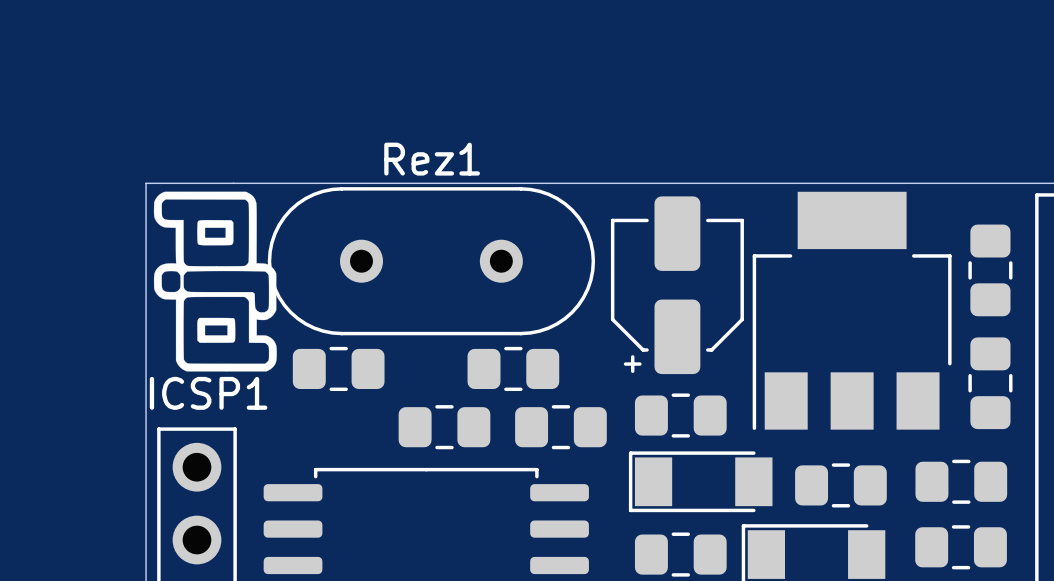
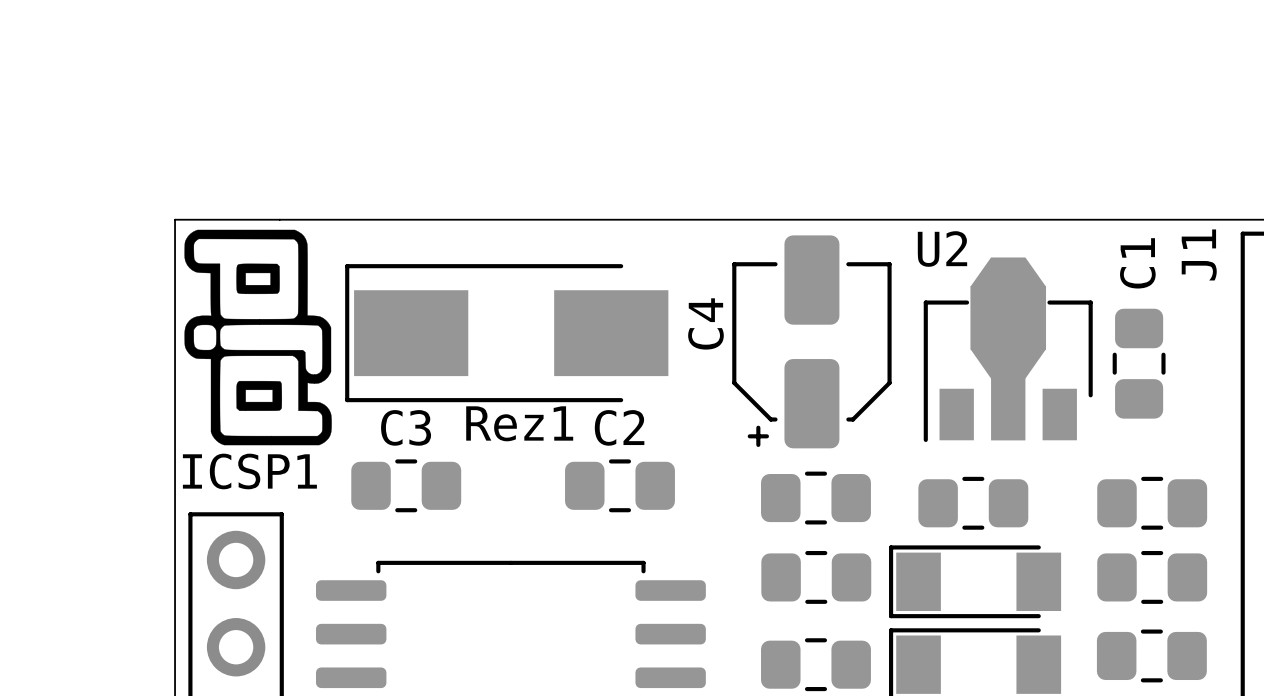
Rez1 name position: Rez1 (432, 159) -> Rez1 (519, 423)
Rez1 footprint: [267, 187, 596, 336] -> [345, 264, 669, 403]
J1 name: none -> J1 (1199, 254)
C4 name: none -> C4 (705, 323)
part: (990, 270) -> none
U2: none -> (1008, 349)
C1: none -> (1139, 363)
part: (852, 310) -> none
part: (338, 368) -> none
part: (513, 368) -> none
part rotation: 0° (990, 383) -> 90° clockwise (1152, 503)
C3: none -> (406, 485)
C2: none -> (619, 485)
part: none -> (973, 503)
part: (444, 427) -> none
part: (560, 427) -> none
part footprint: [628, 451, 773, 513] -> [761, 550, 872, 604]
part footprint: [795, 463, 887, 508] -> [889, 545, 1062, 619]

